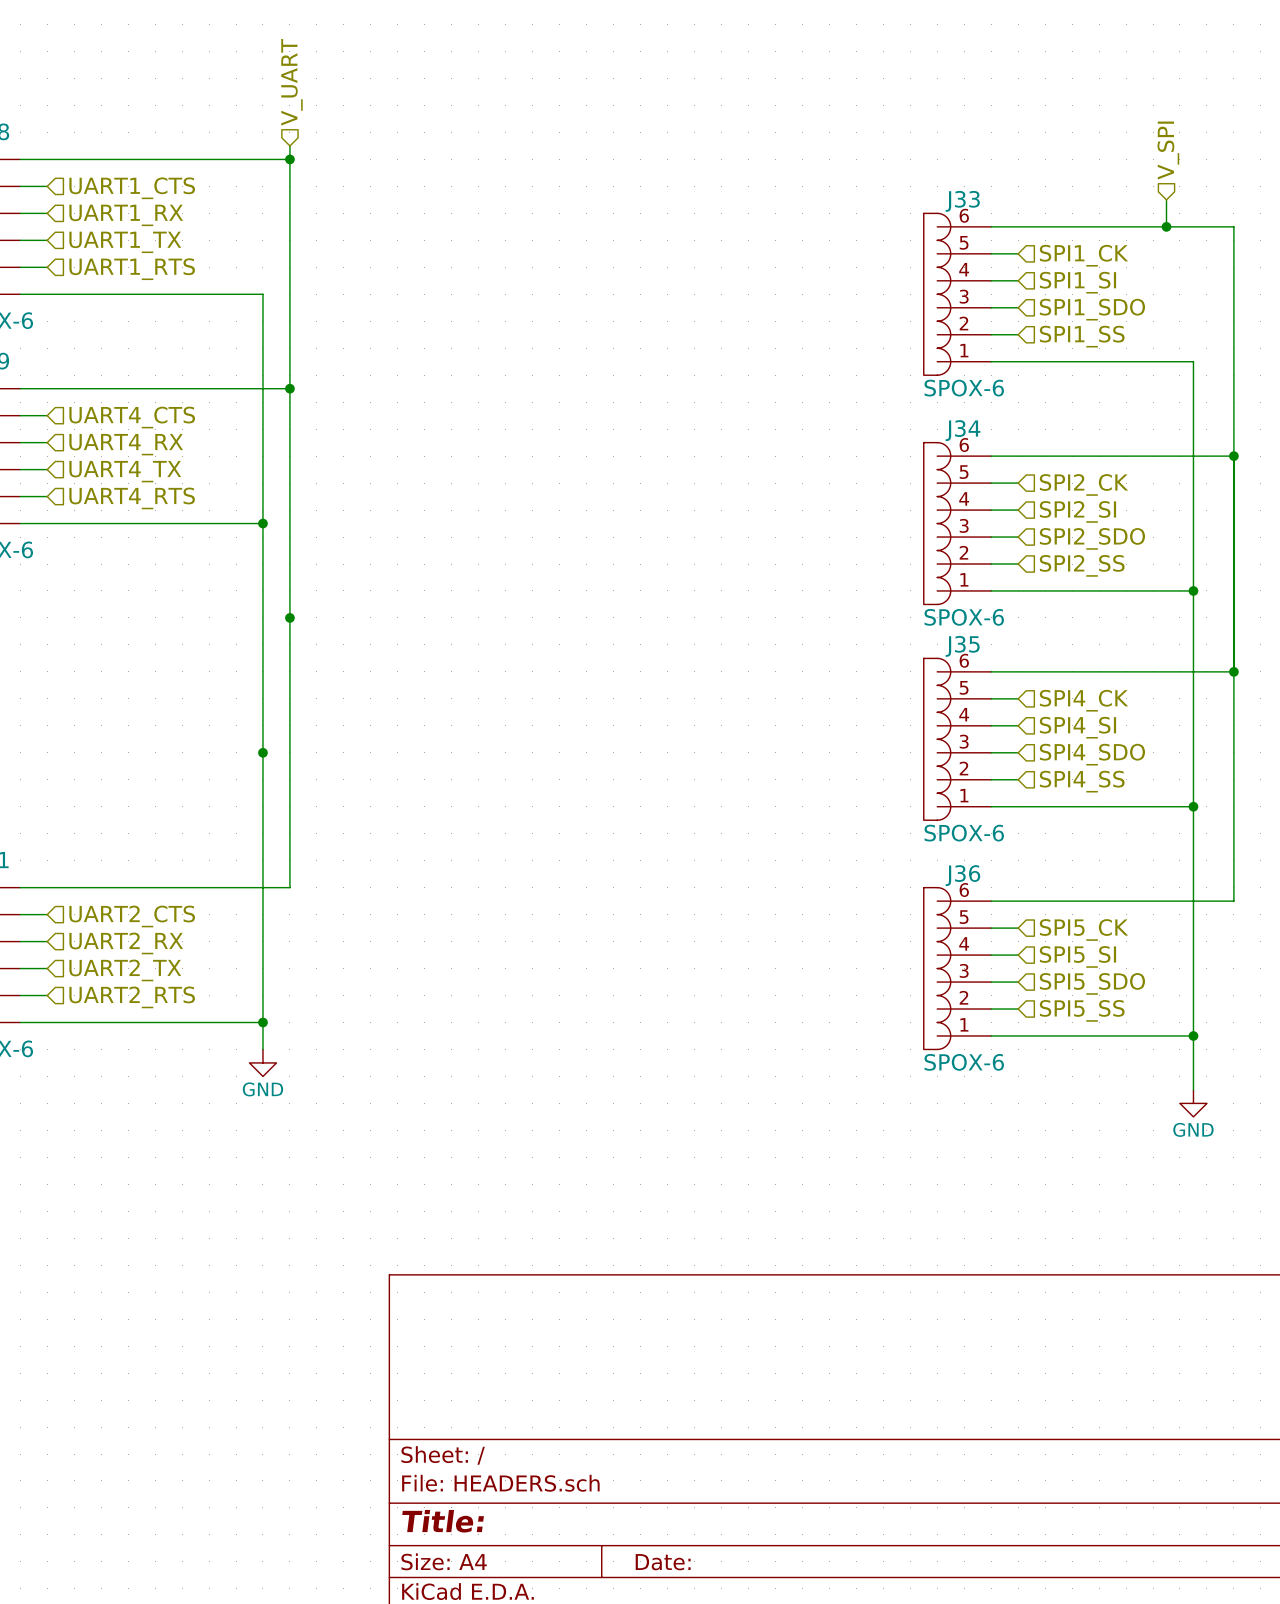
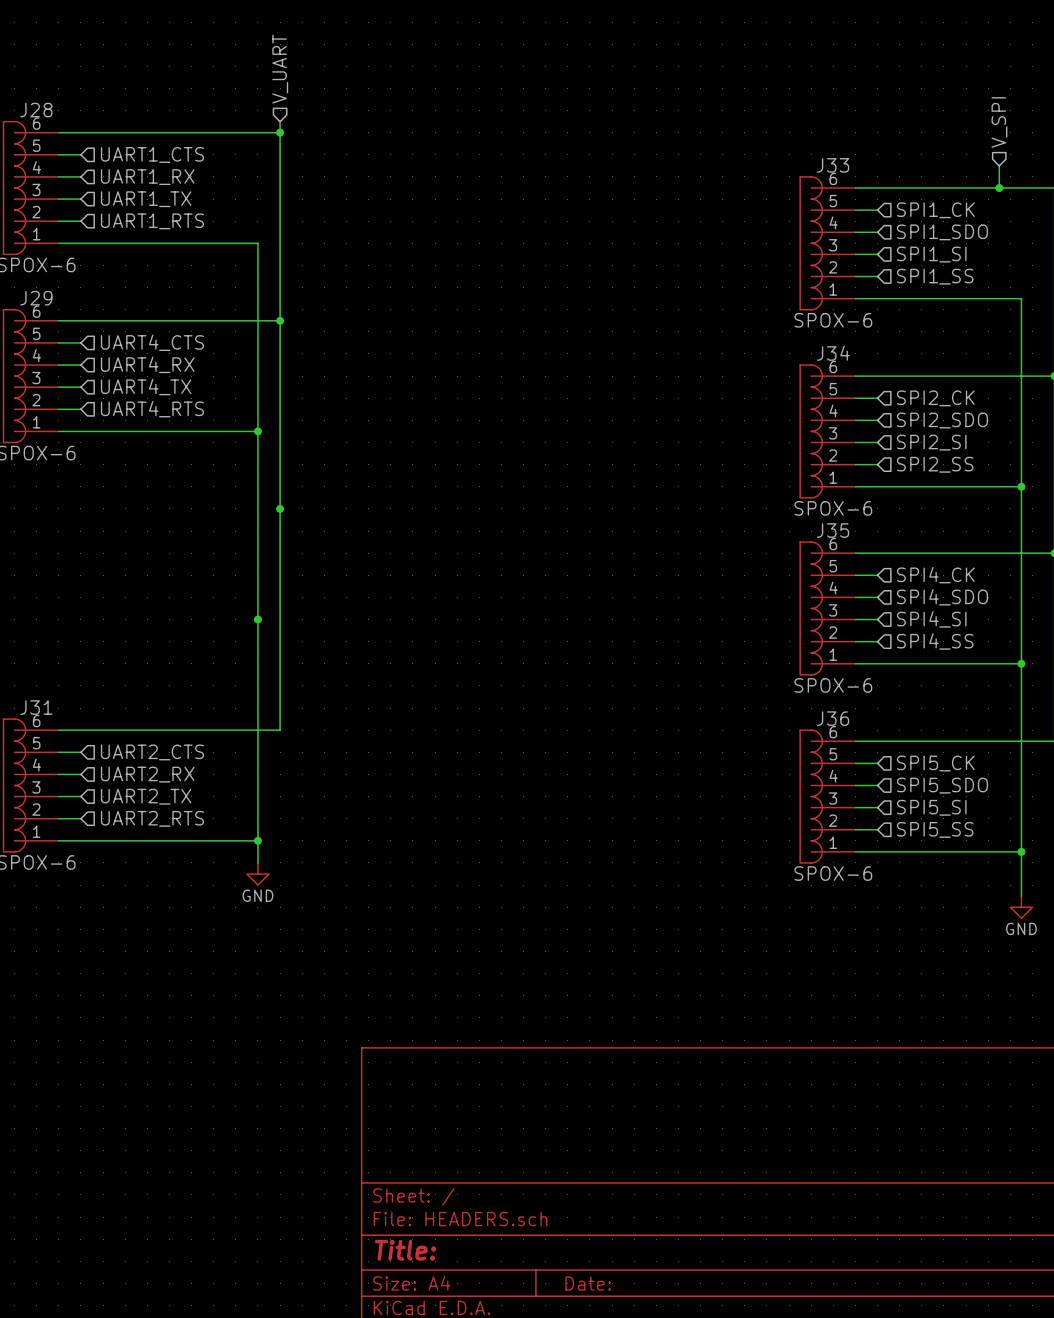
hierarchical label: SPI1_SI (1077, 282) -> SPI1_SDO (942, 232)
hierarchical label: SPI1_SDO (1092, 309) -> SPI1_SI (931, 254)
hierarchical label: SPI2_SI (1077, 511) -> SPI2_SDO (942, 420)
hierarchical label: SPI2_SDO (1092, 538) -> SPI2_SI (931, 442)
hierarchical label: SPI4_SI (1077, 727) -> SPI4_SDO (942, 597)
hierarchical label: SPI4_SDO (1092, 754) -> SPI4_SI (931, 619)
hierarchical label: SPI5_SI (1077, 956) -> SPI5_SDO (942, 785)
hierarchical label: SPI5_SDO (1092, 983) -> SPI5_SI (931, 807)

